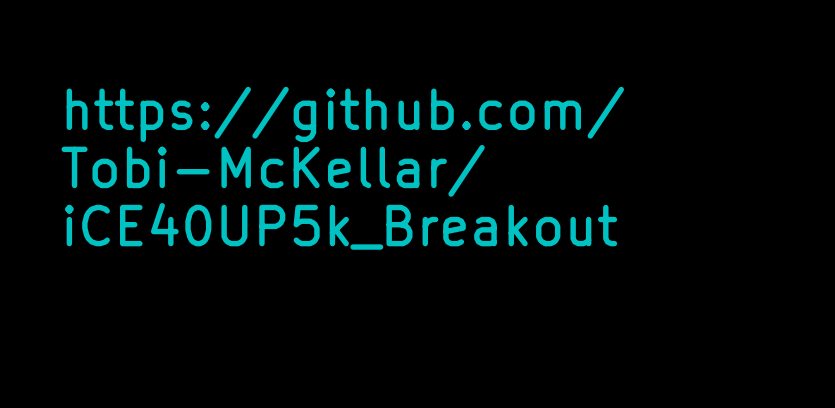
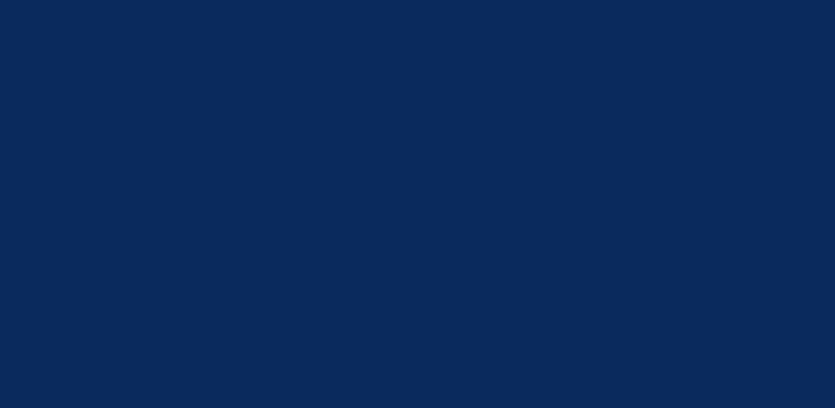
text: https://github.com/ (345, 114) -> none
text: Tobi-McKellar/ (273, 170) -> none
text: iCE40UP5k_Breakout (341, 226) -> none

